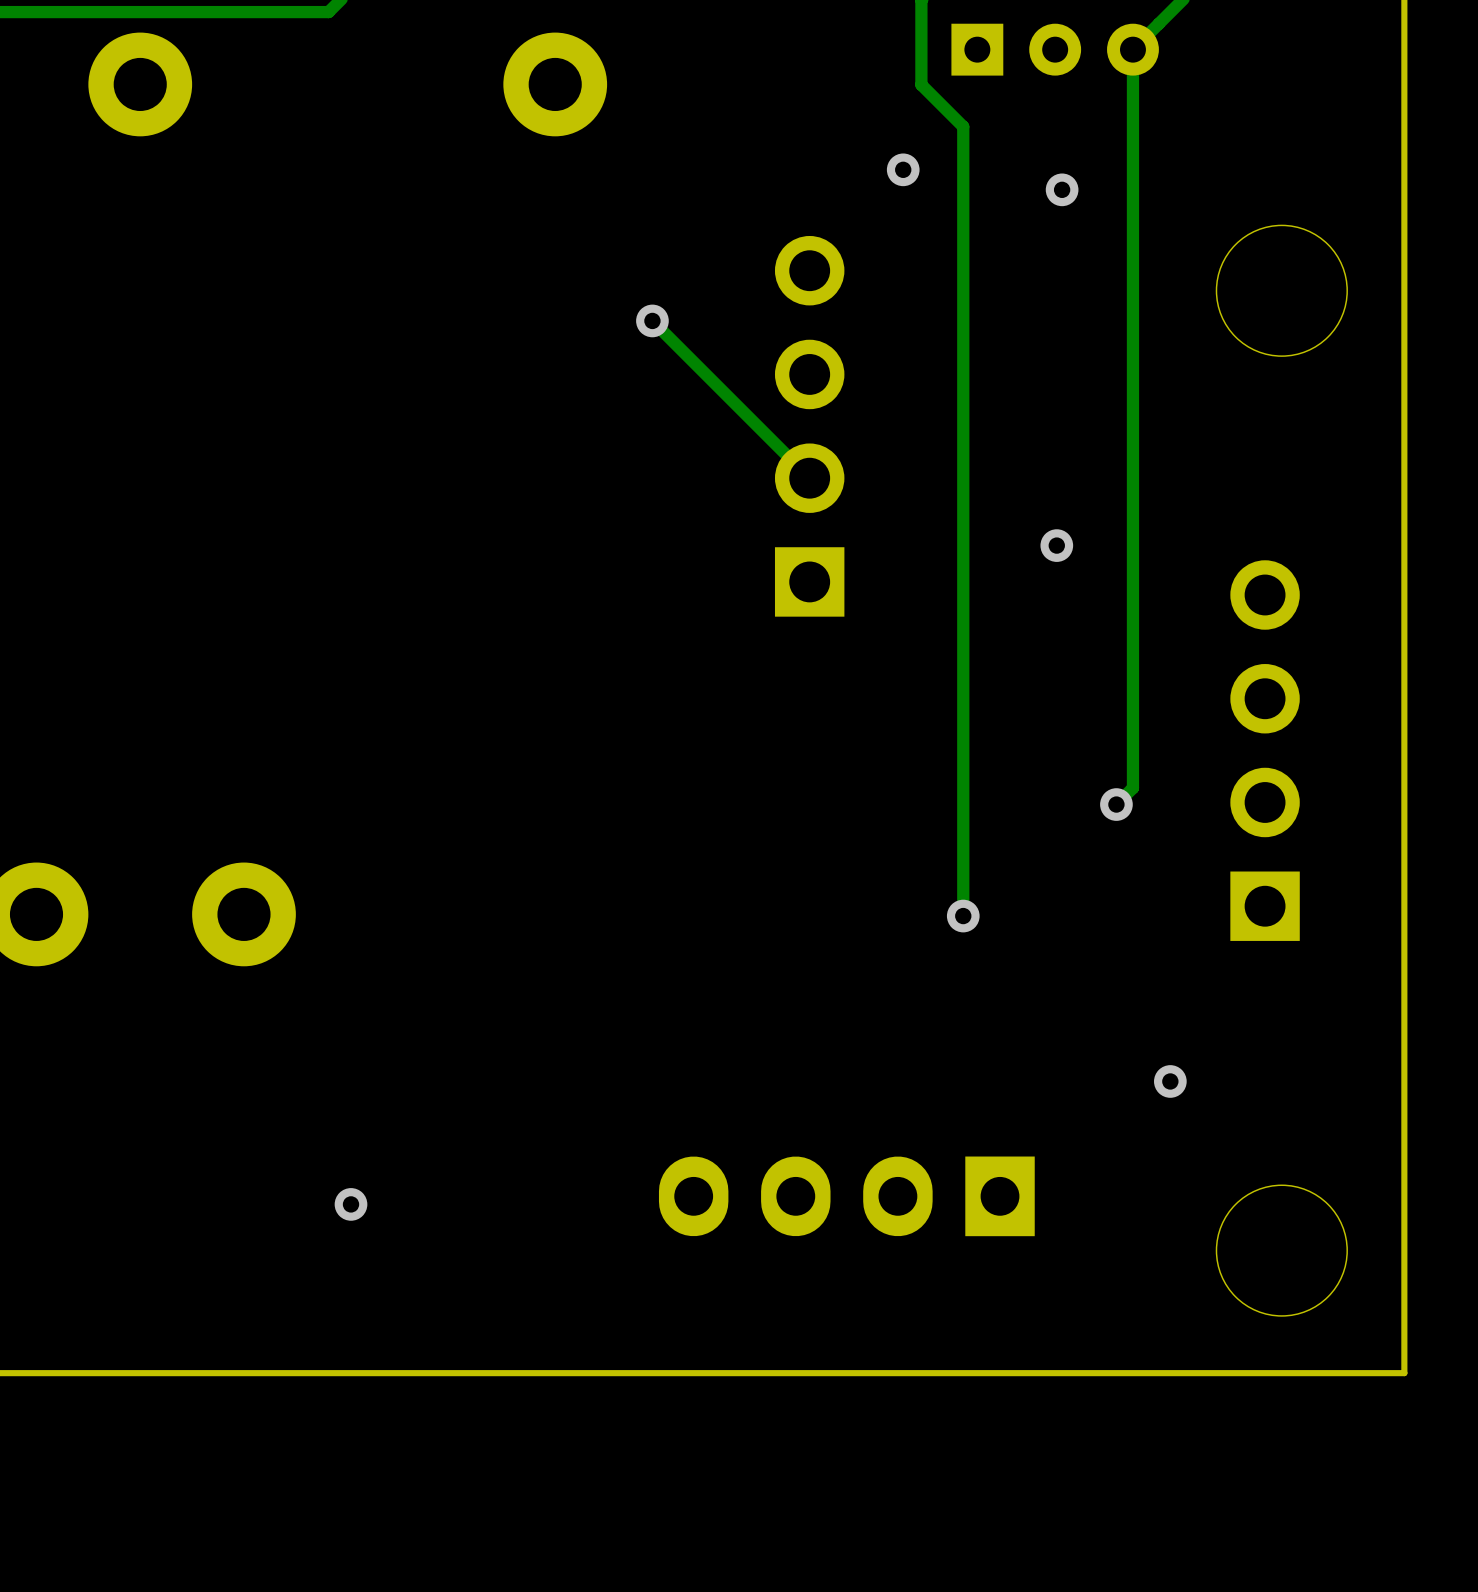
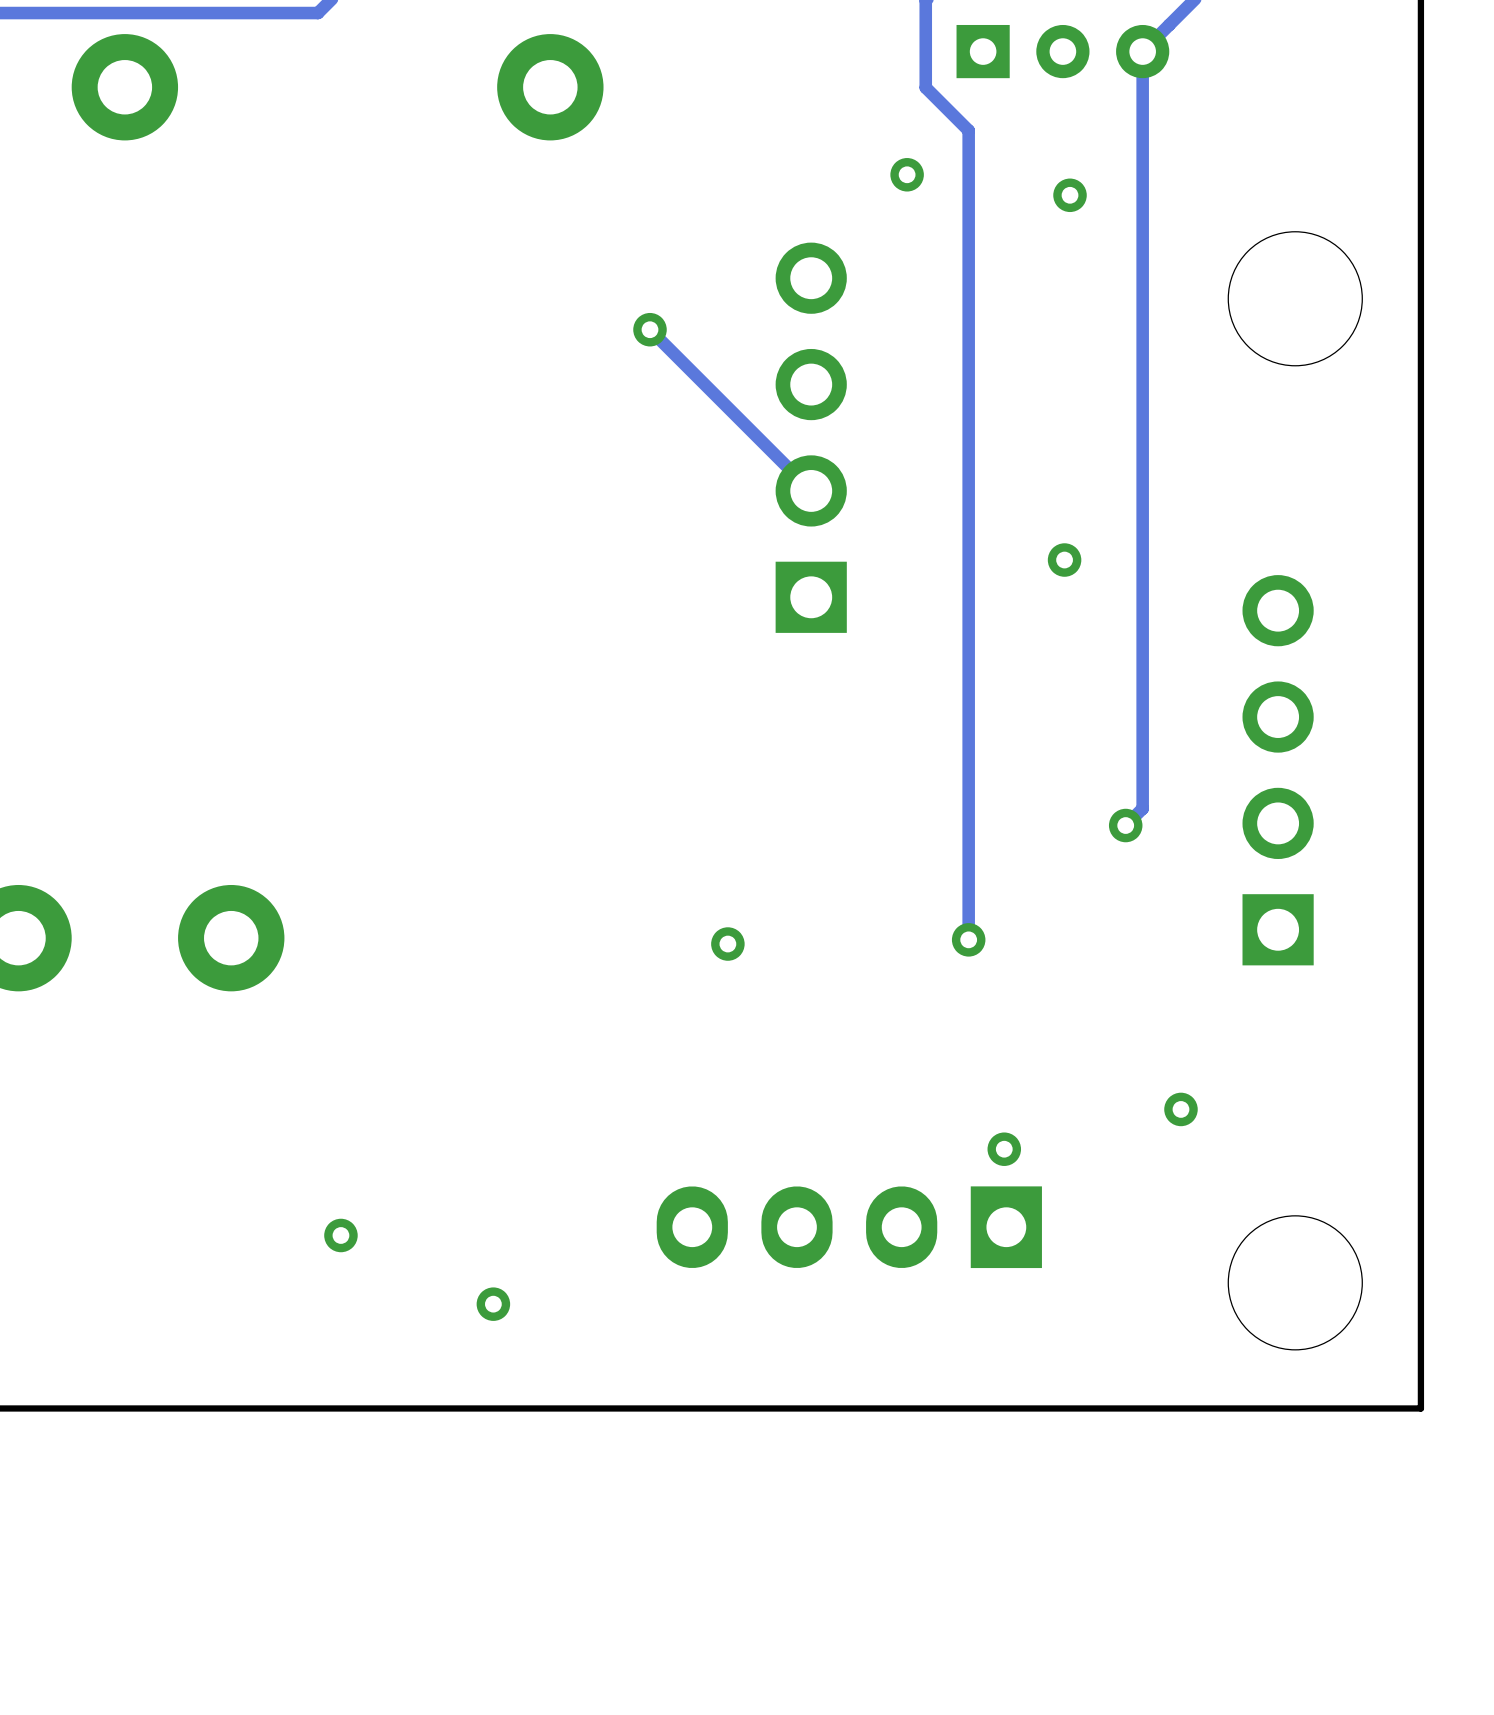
via: none -> (727, 944)
via: none -> (1004, 1149)
via: none -> (493, 1304)

